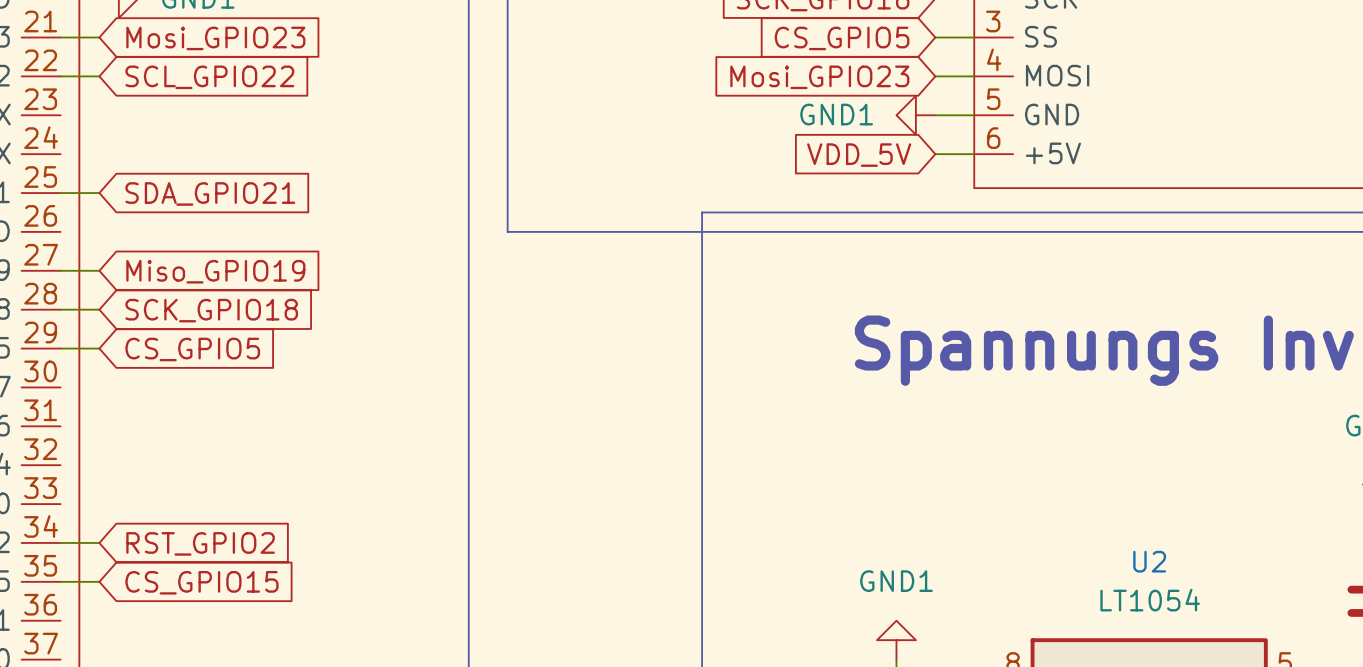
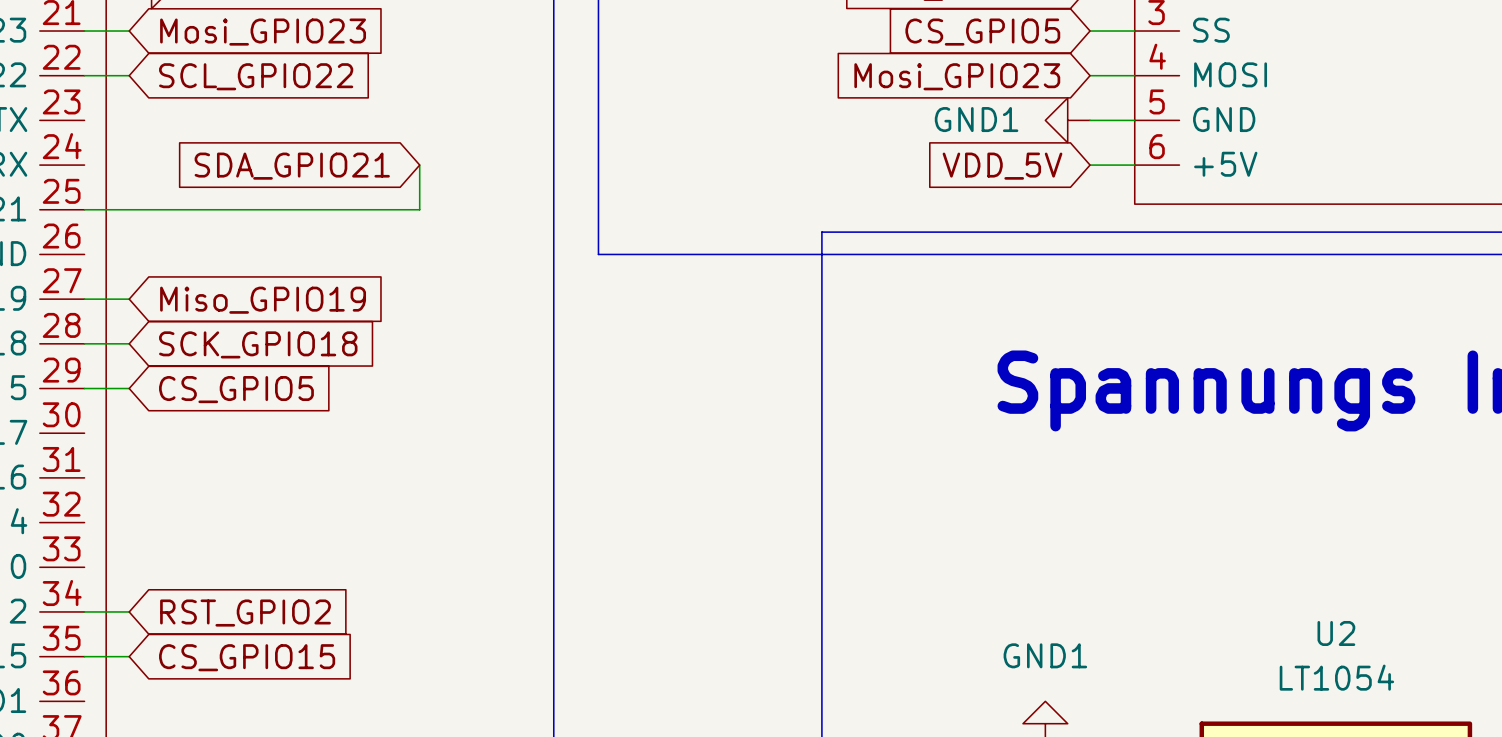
wire: none -> (419, 165) (419, 209) (129, 209)
global label rotation: 0° (210, 193) -> 180° (292, 166)

